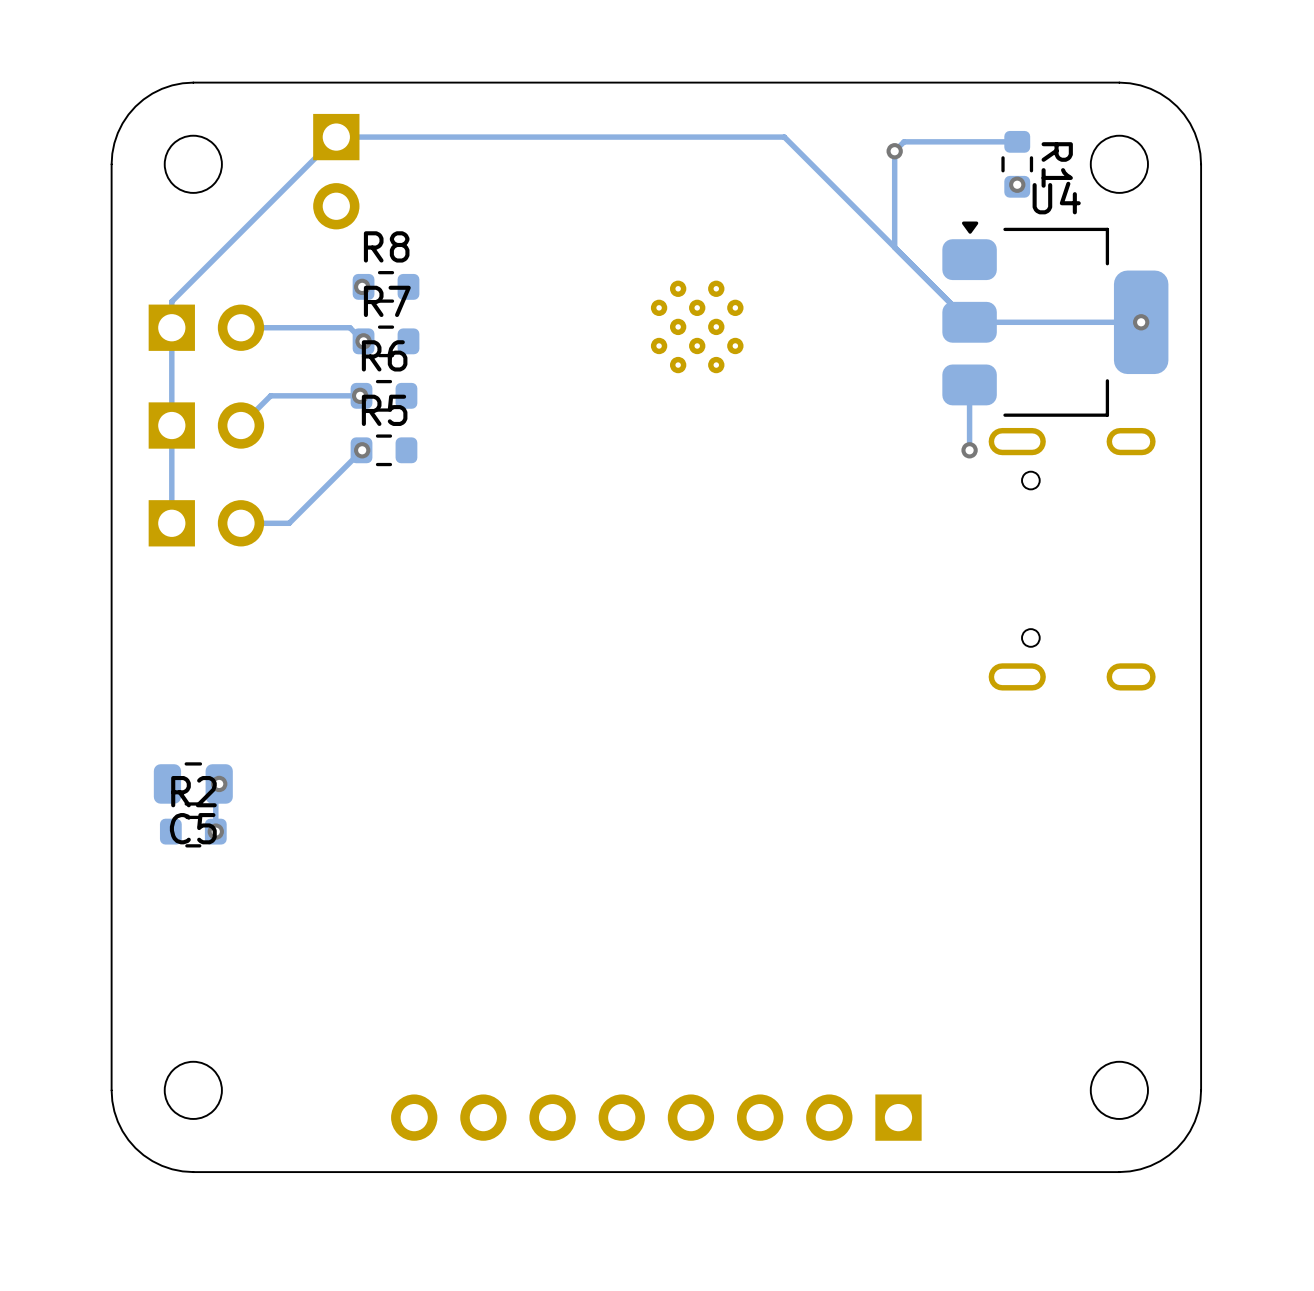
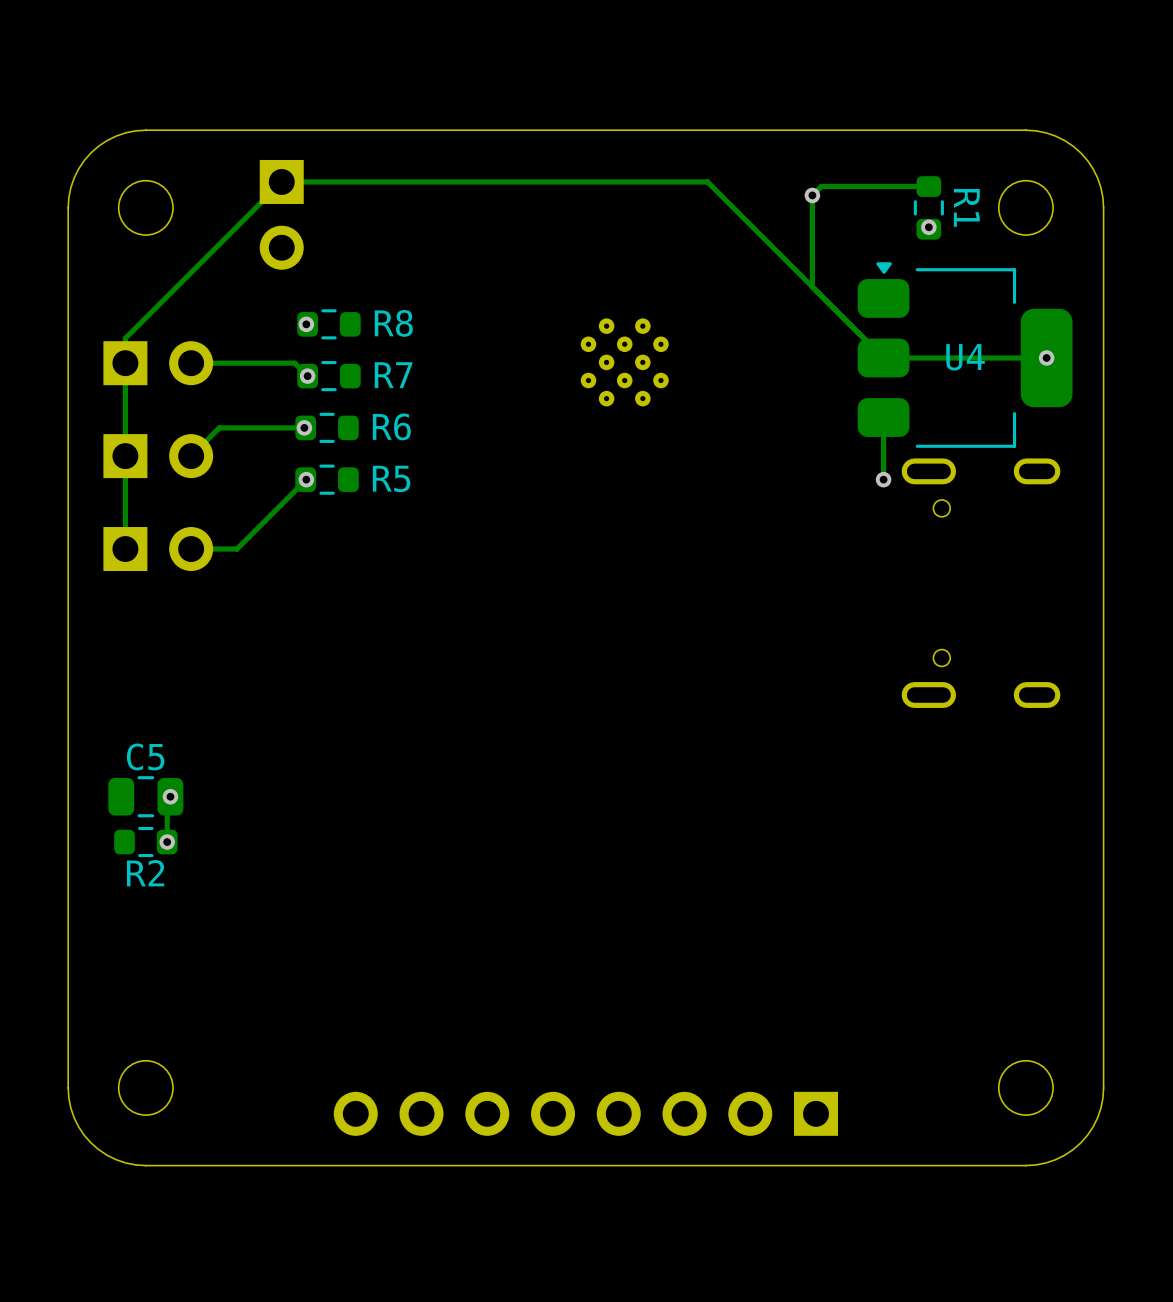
U4 name position: U4 (1056, 198) -> U4 (965, 357)
R8 name position: R8 (386, 246) -> R8 (393, 323)
R7 name position: R7 (387, 301) -> R7 (393, 375)
R6 name position: R6 (384, 355) -> R6 (391, 426)
R5 name position: R5 (384, 410) -> R5 (391, 478)
R2 name position: R2 (193, 791) -> R2 (145, 873)
C5 name position: C5 (193, 828) -> C5 (145, 756)

